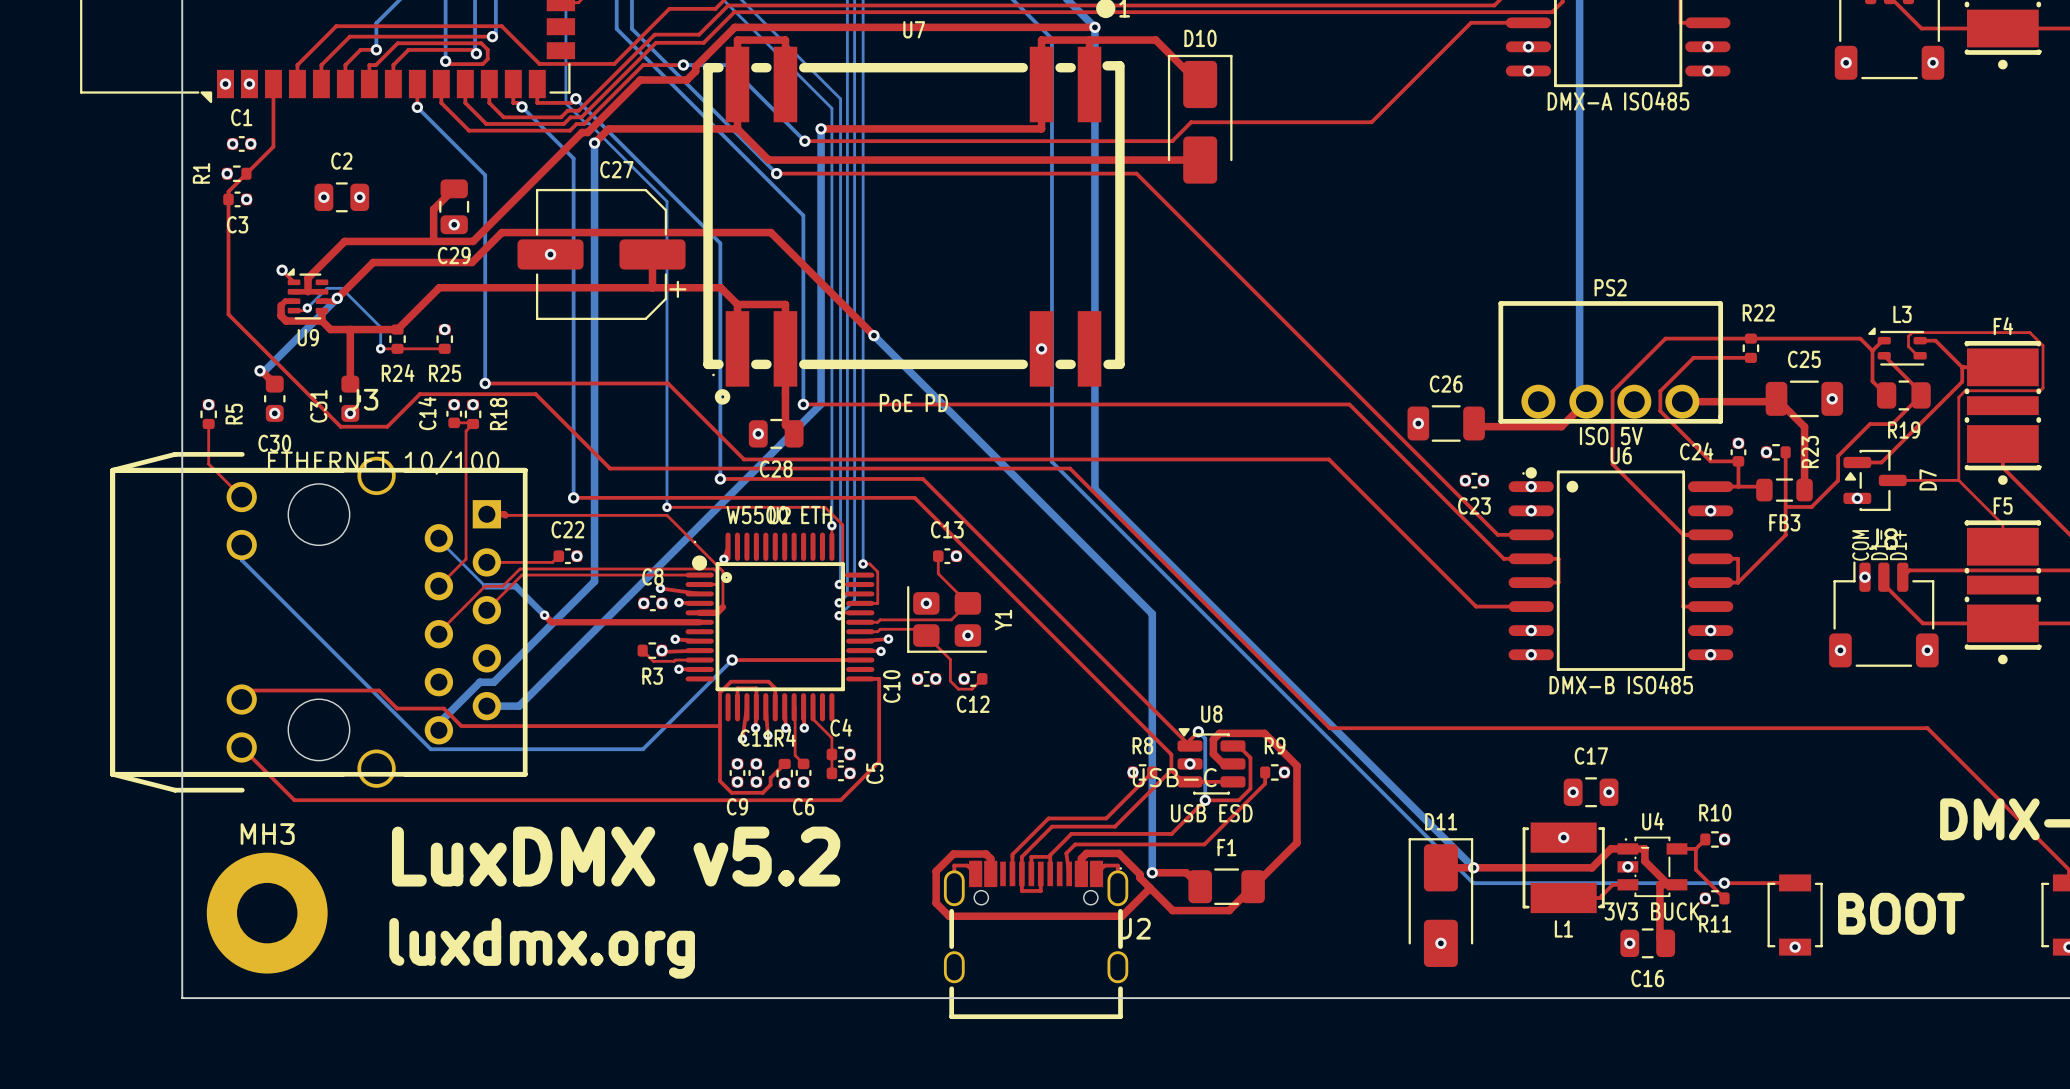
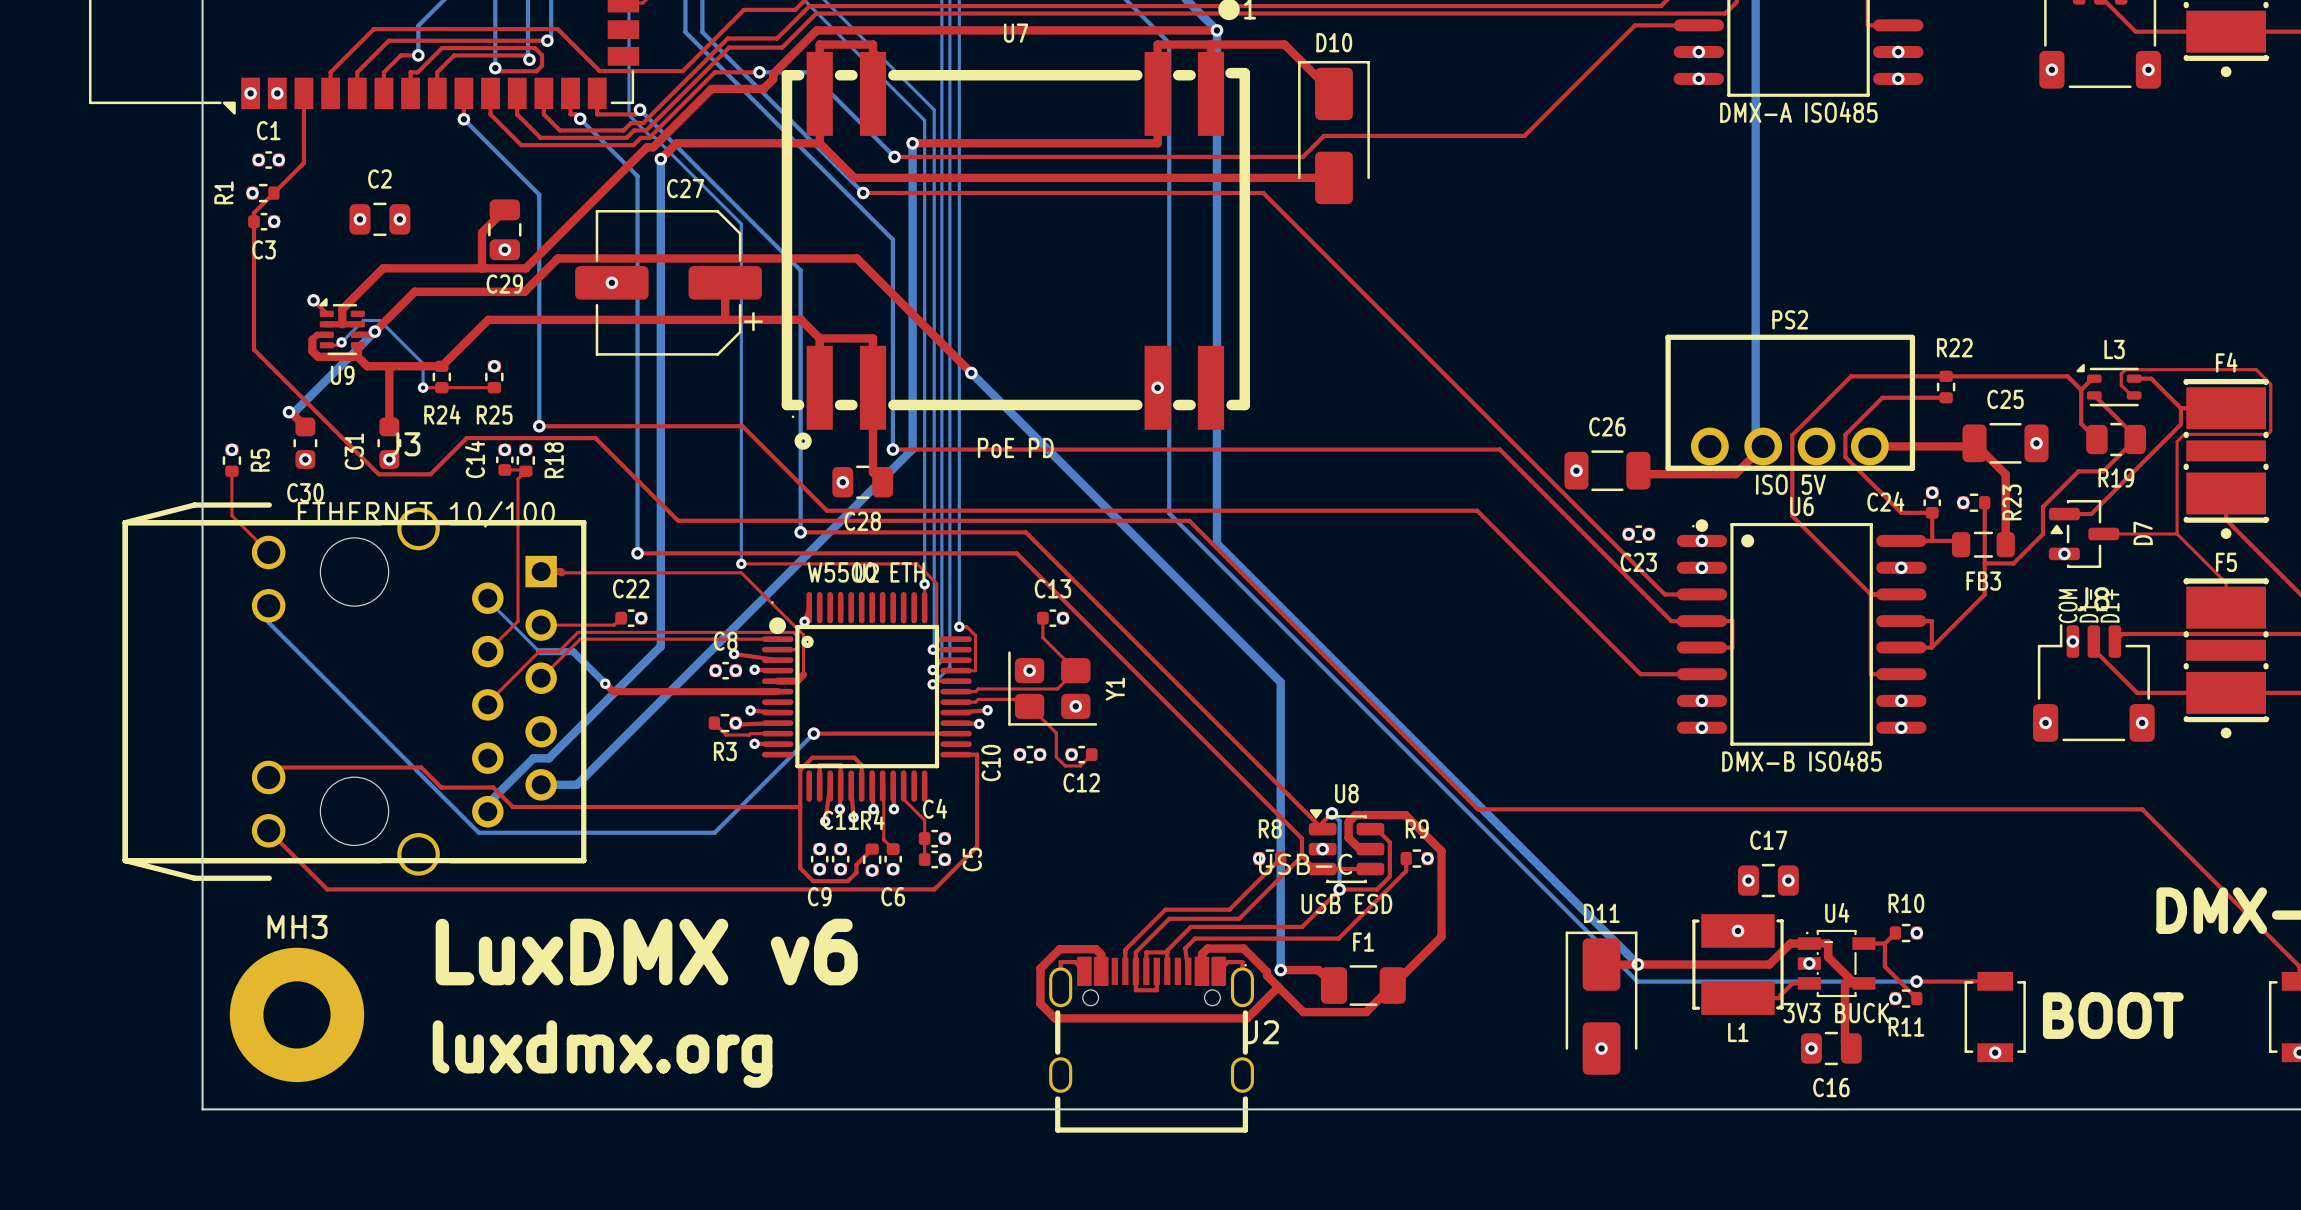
text: LuxDMX v5.2 (616, 856) -> LuxDMX v6 (646, 952)

